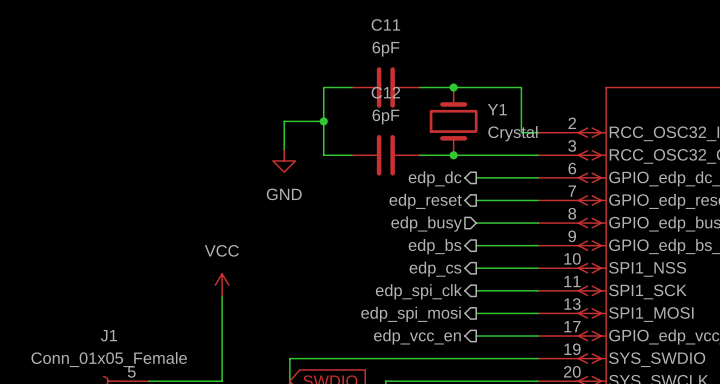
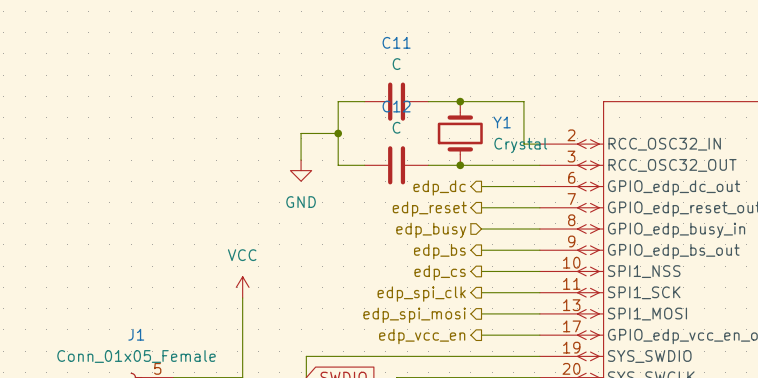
C11 value: 6pF (385, 49) -> C (396, 64)
C12 value: 6pF (385, 116) -> C (396, 127)

